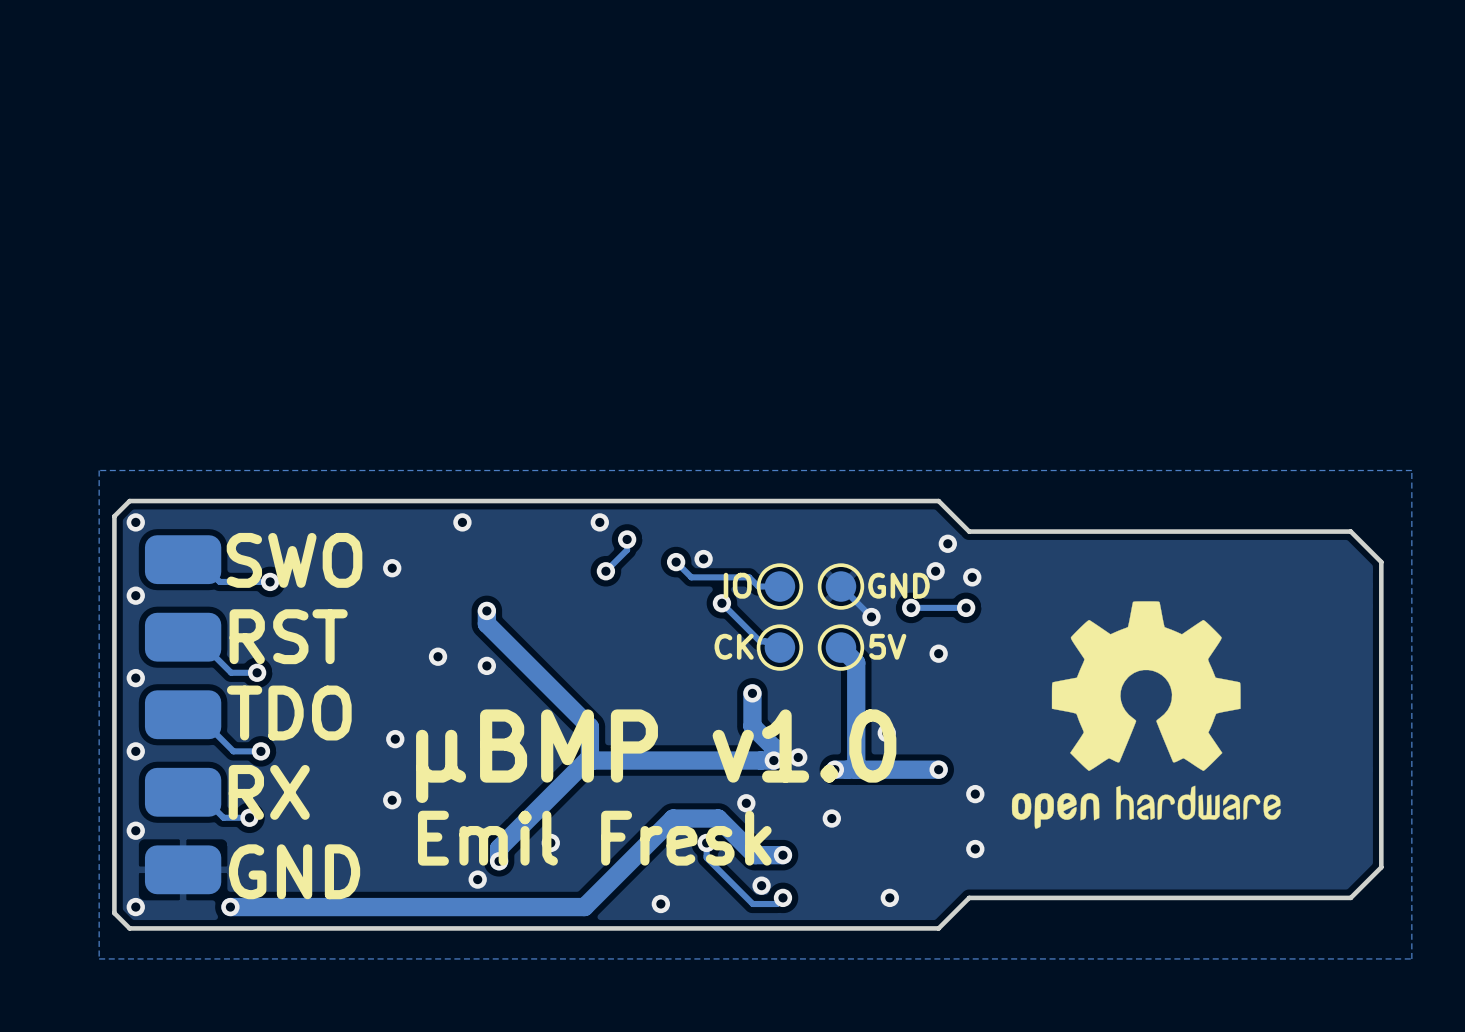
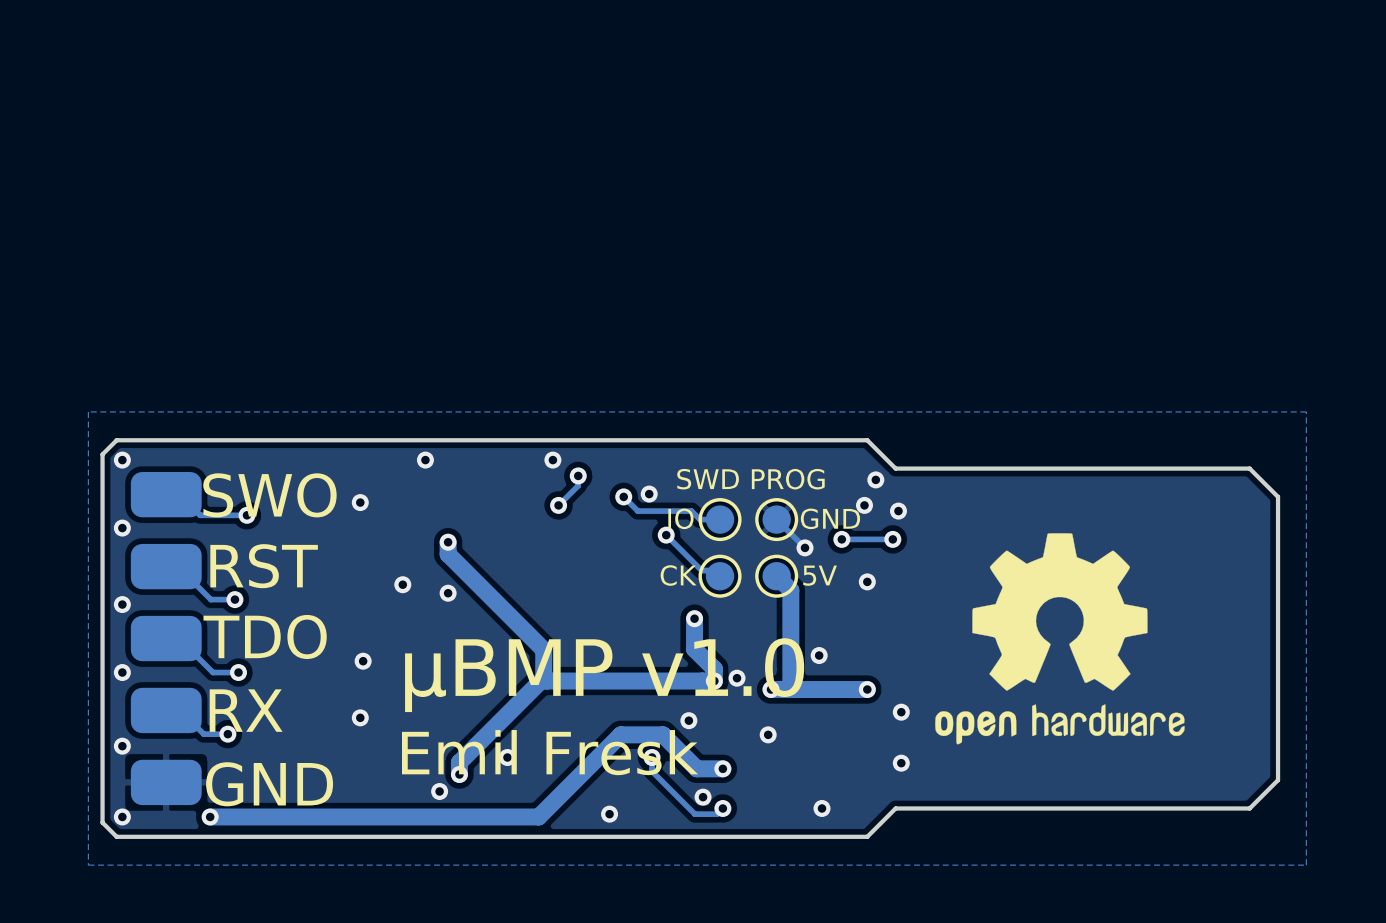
text: none -> SWD PROG (750, 479)

